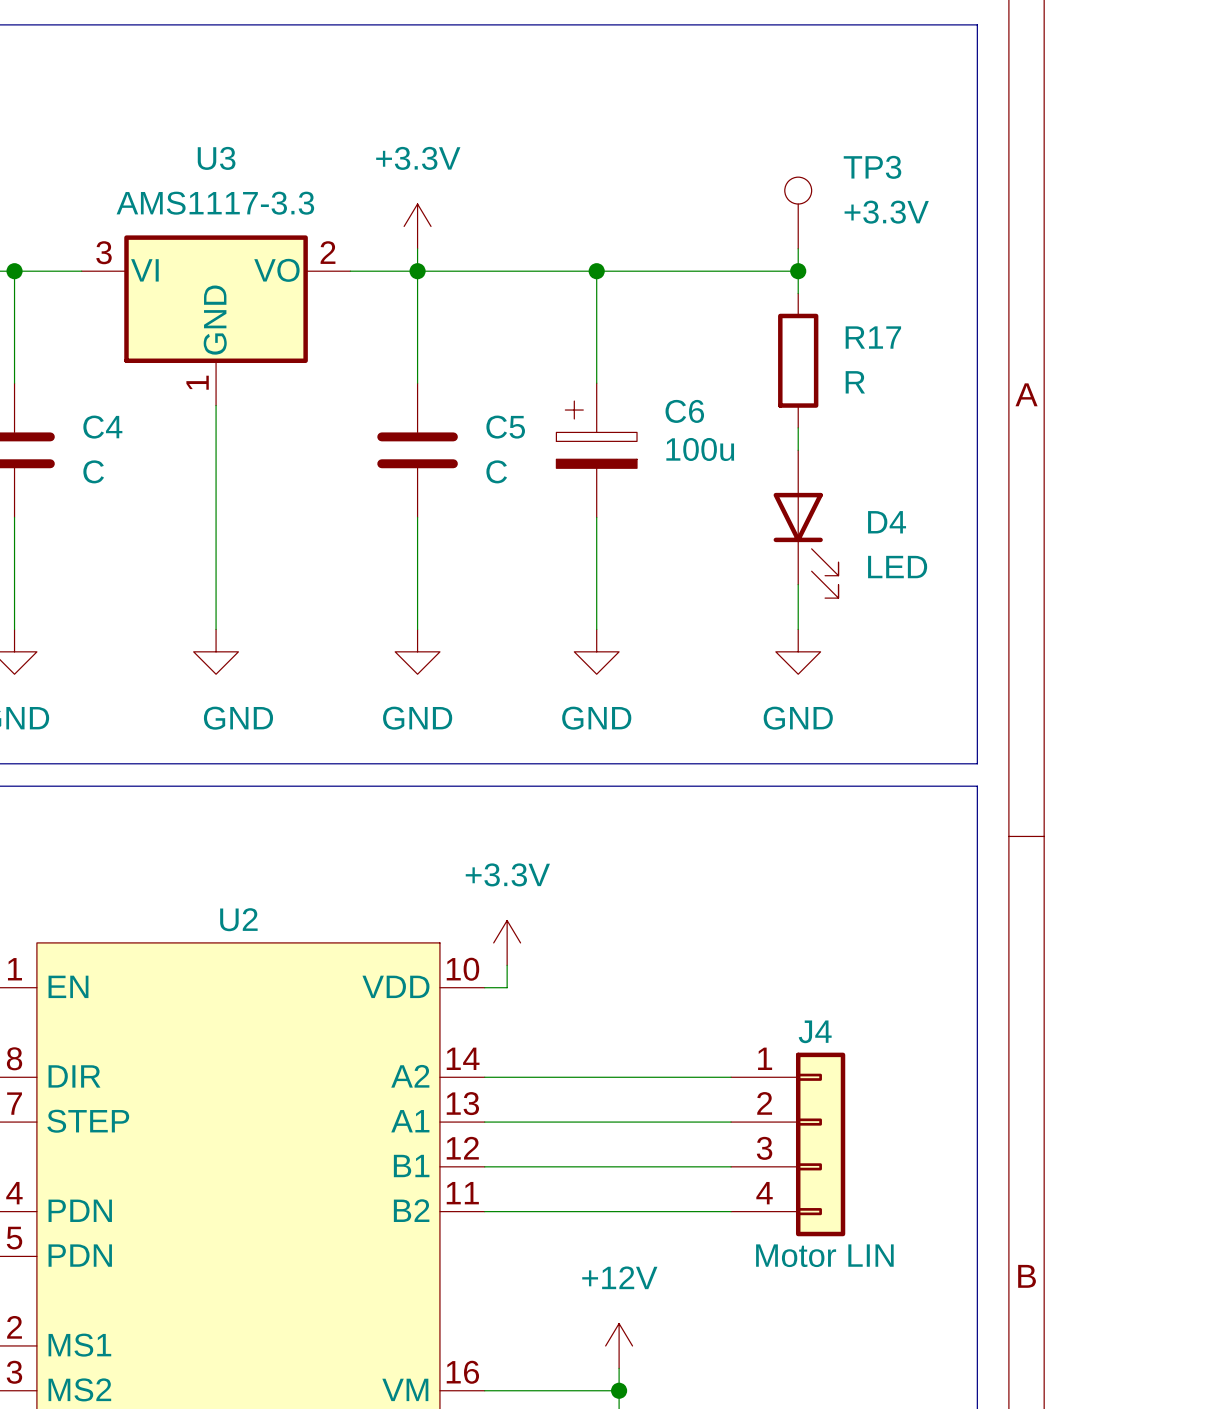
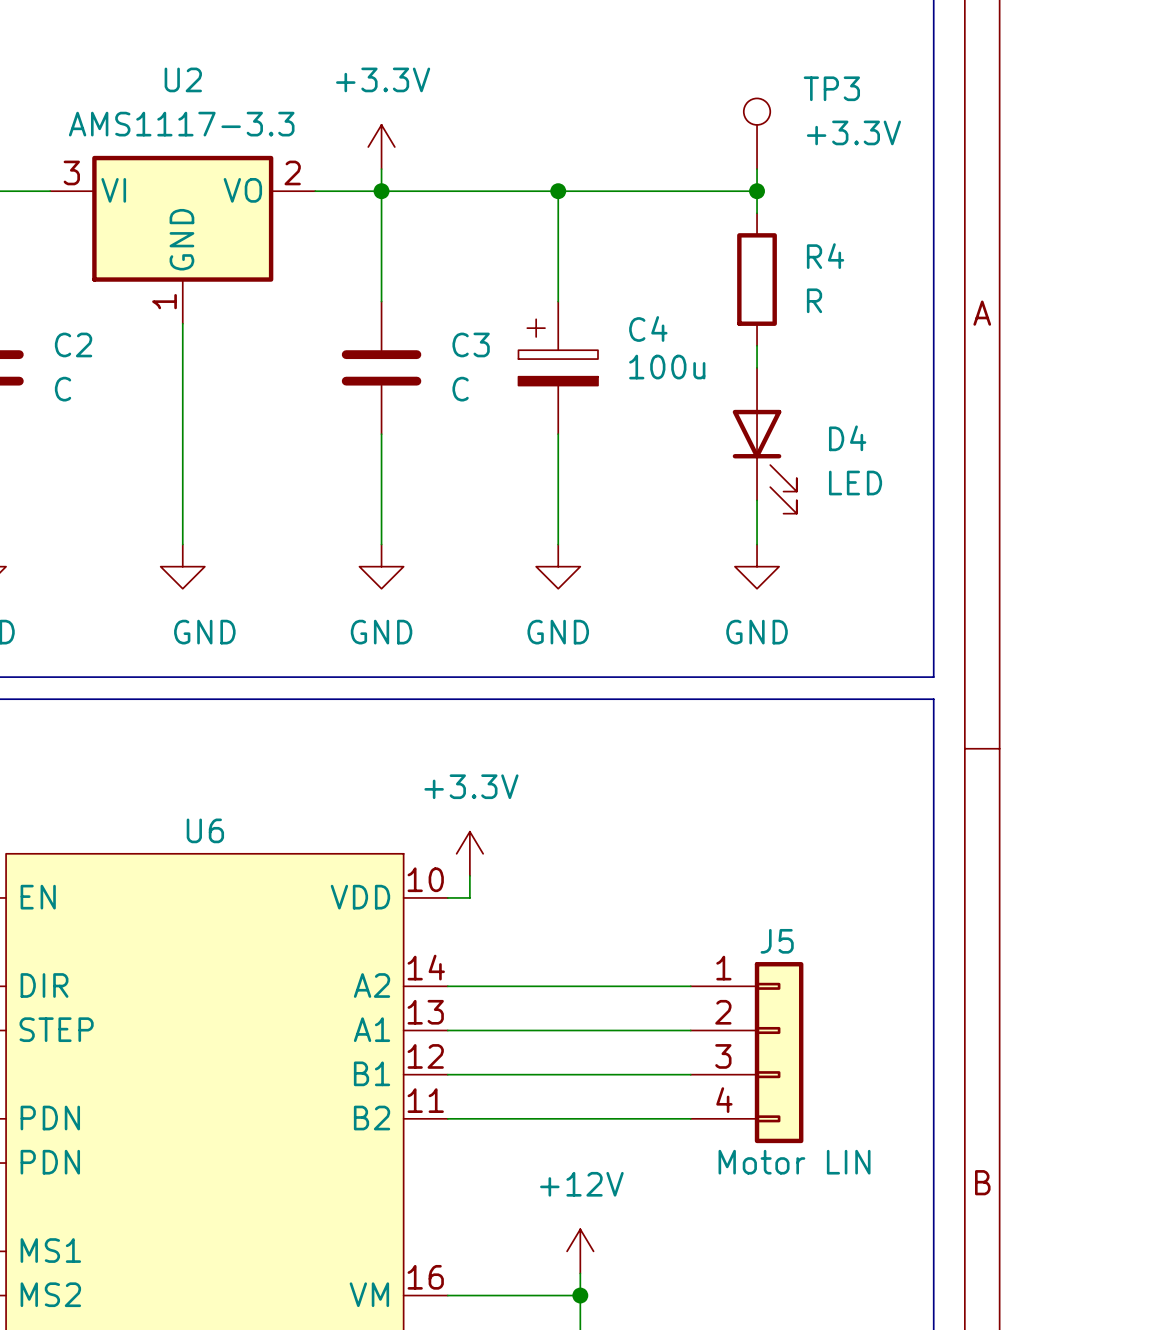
U3 name: U3 (216, 158) -> U2 (183, 79)
R17 name: R17 (873, 337) -> R4 (825, 256)
C6 name: C6 (684, 411) -> C4 (648, 328)
C4 name: C4 (102, 427) -> C2 (73, 344)
C5 name: C5 (505, 427) -> C3 (471, 344)
U2 name: U2 (238, 919) -> U6 (205, 830)
J4 name: J4 (815, 1031) -> J5 (777, 941)

